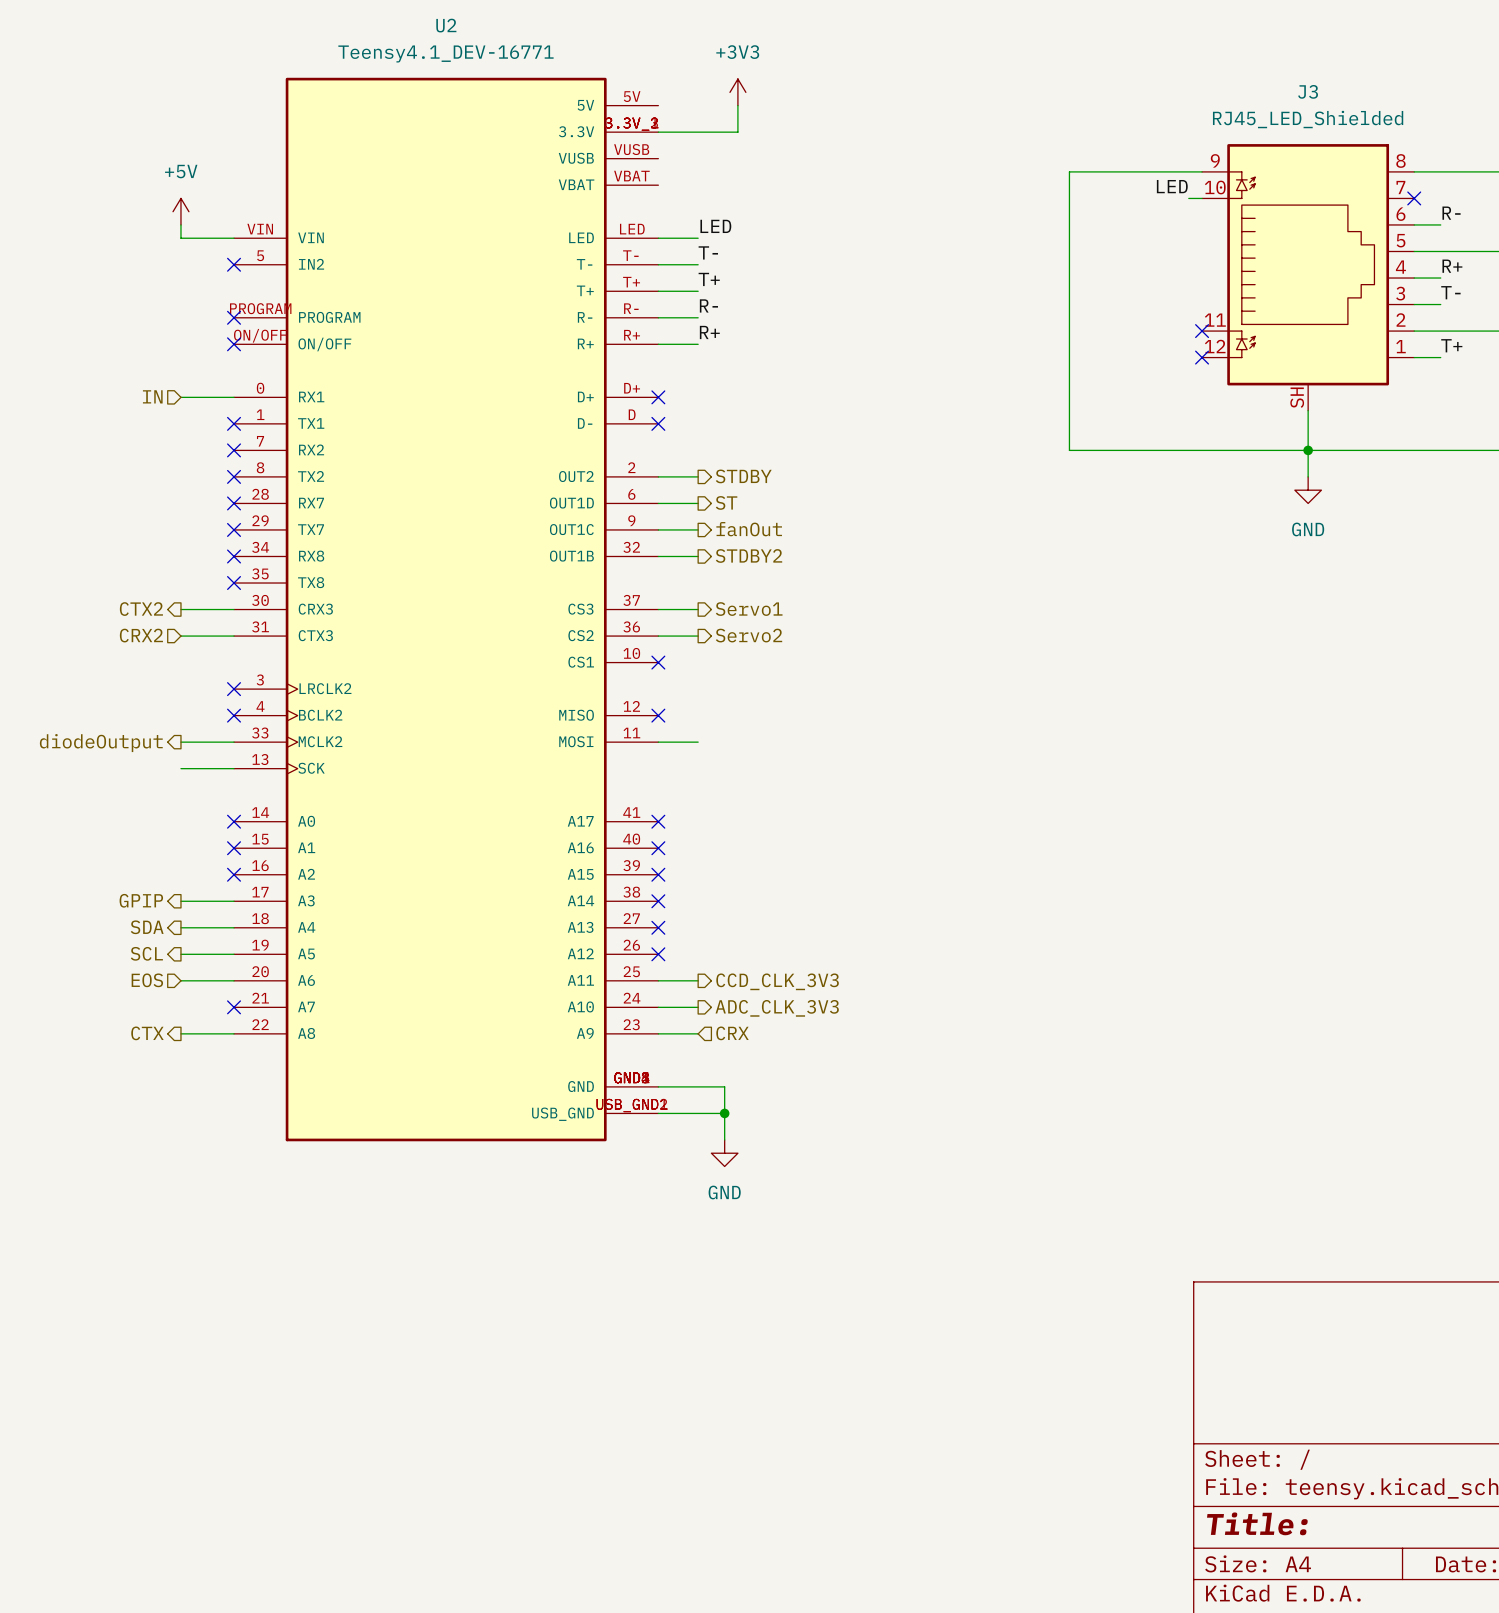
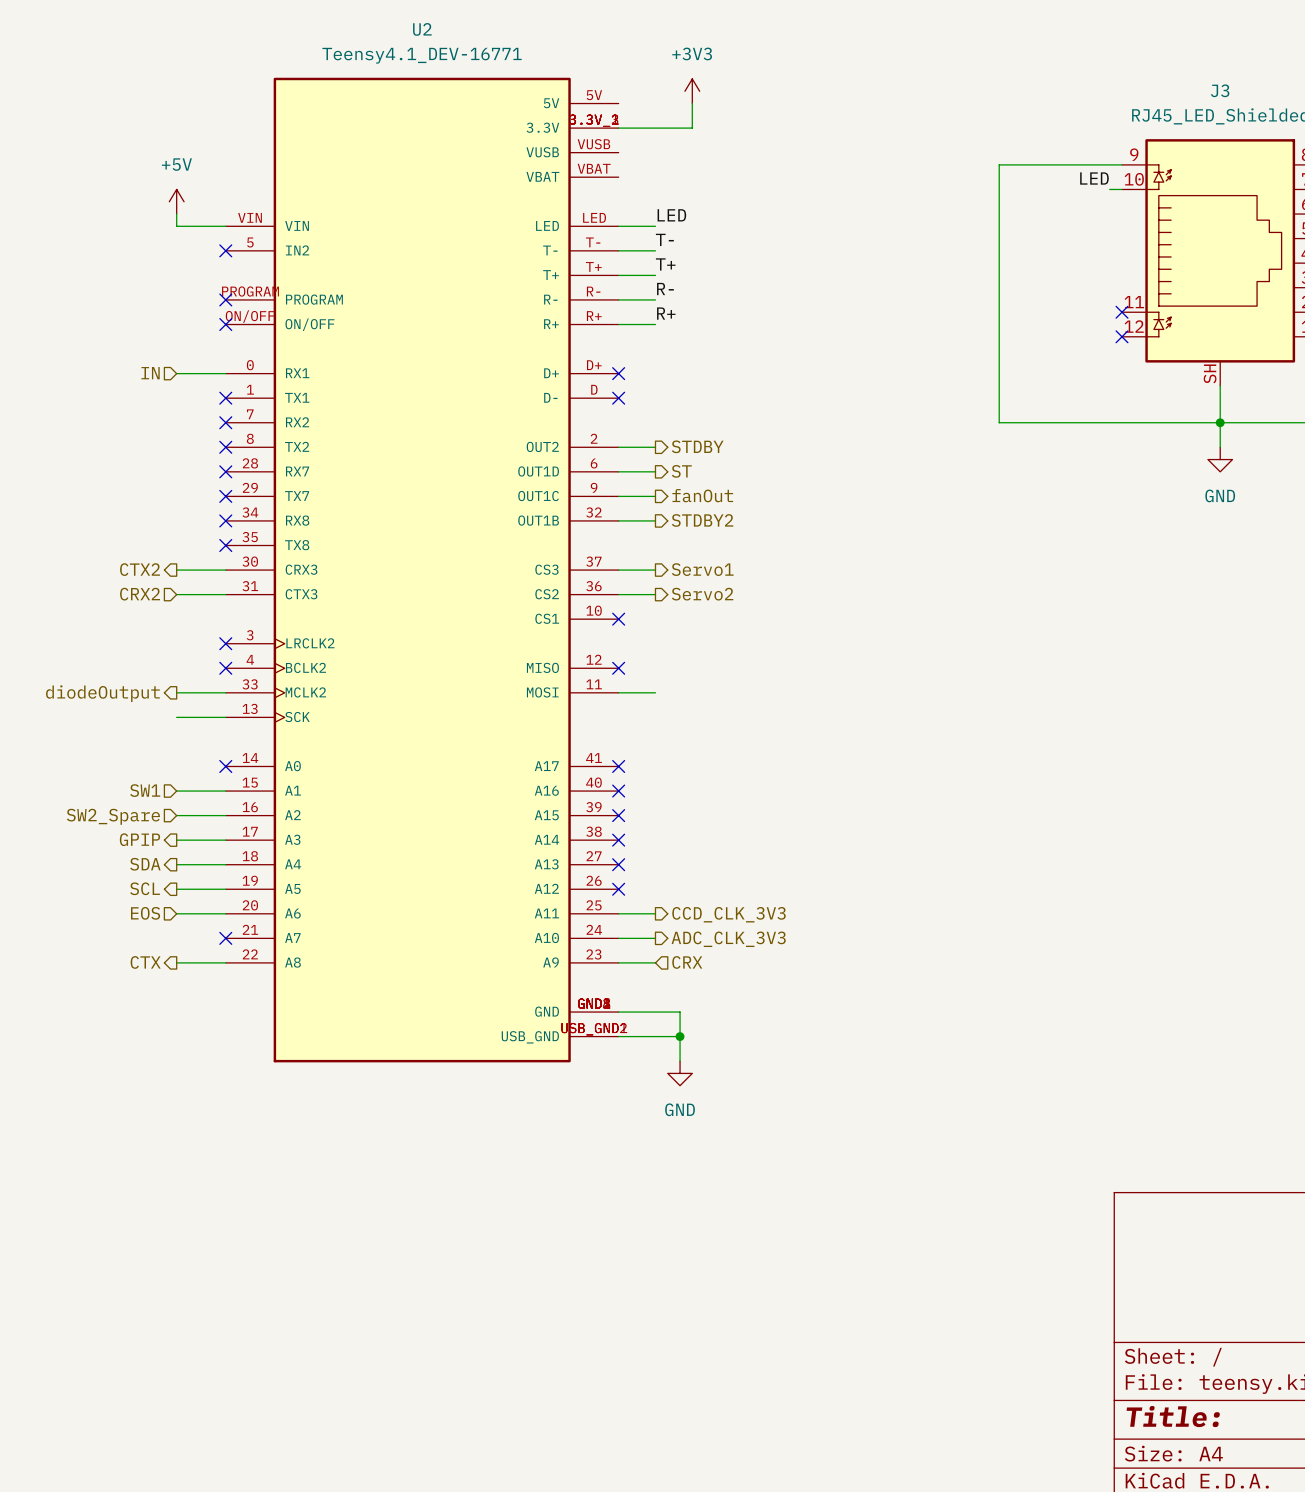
hierarchical label: none -> SW1 (145, 790)
wire: none -> (176, 791) (225, 791)
no-connect mark: (234, 848) -> none
wire: none -> (176, 815) (225, 815)
no-connect mark: (234, 874) -> none
hierarchical label: none -> SW2_Spare (113, 816)

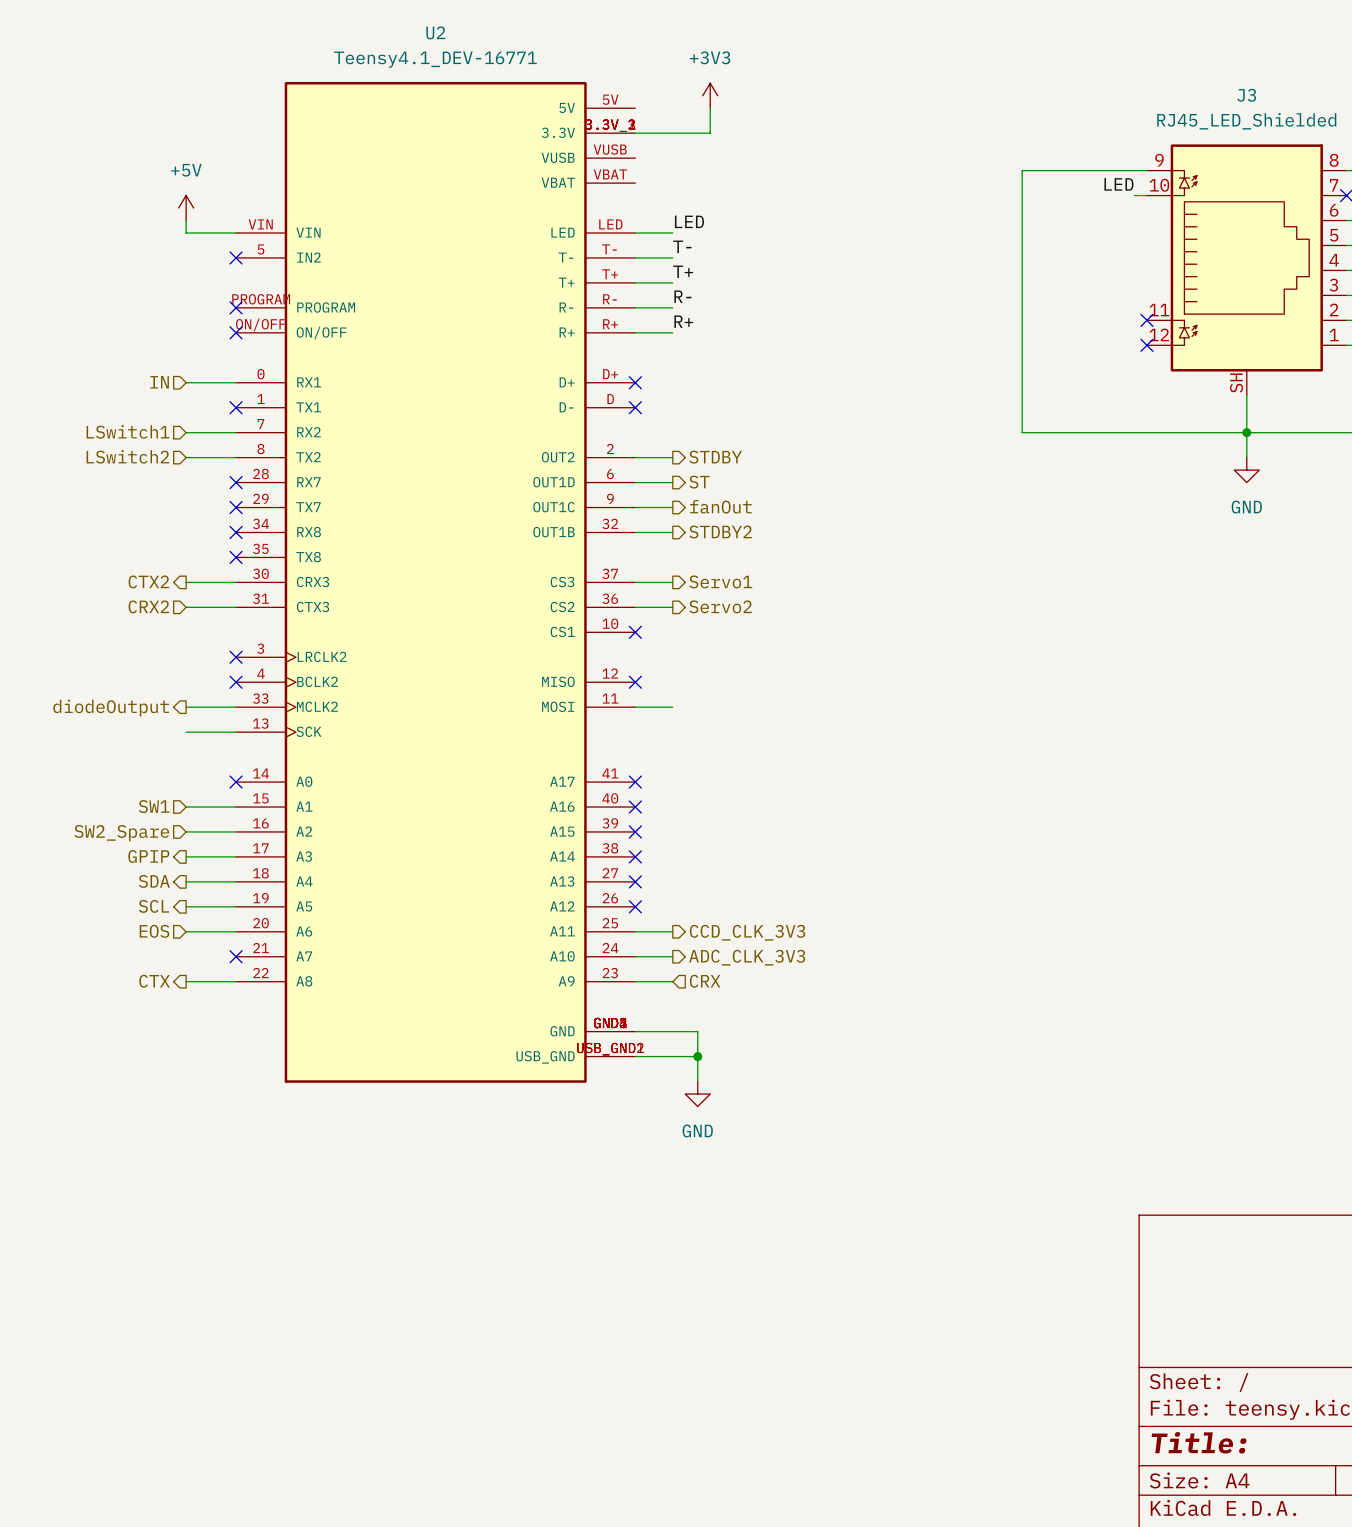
hierarchical label: none -> LSwitch1 (128, 431)
wire: none -> (186, 432) (236, 432)
no-connect mark: (225, 422) -> none
hierarchical label: none -> LSwitch2 (127, 456)
wire: none -> (186, 457) (236, 457)
no-connect mark: (225, 447) -> none

